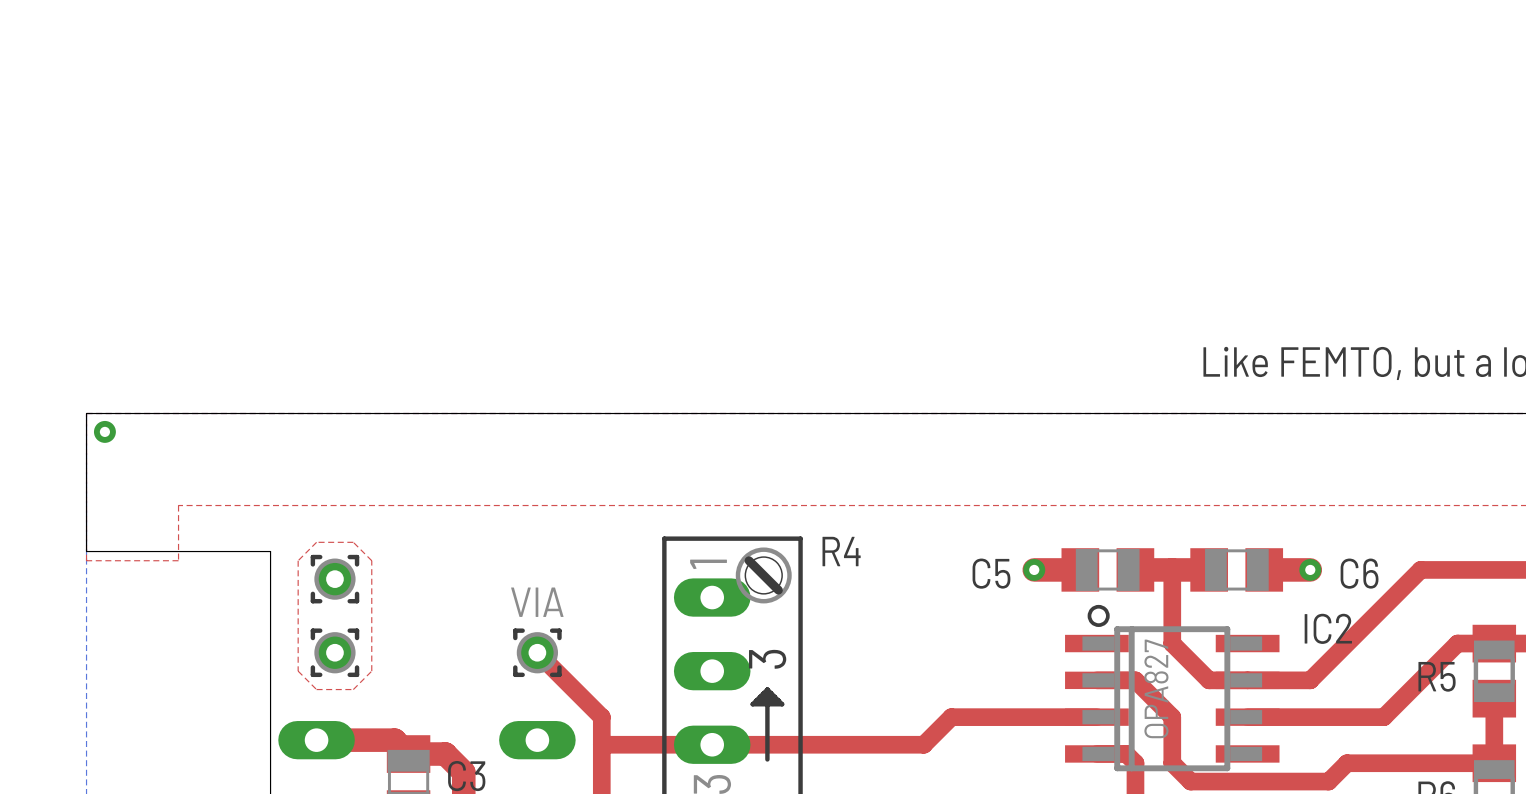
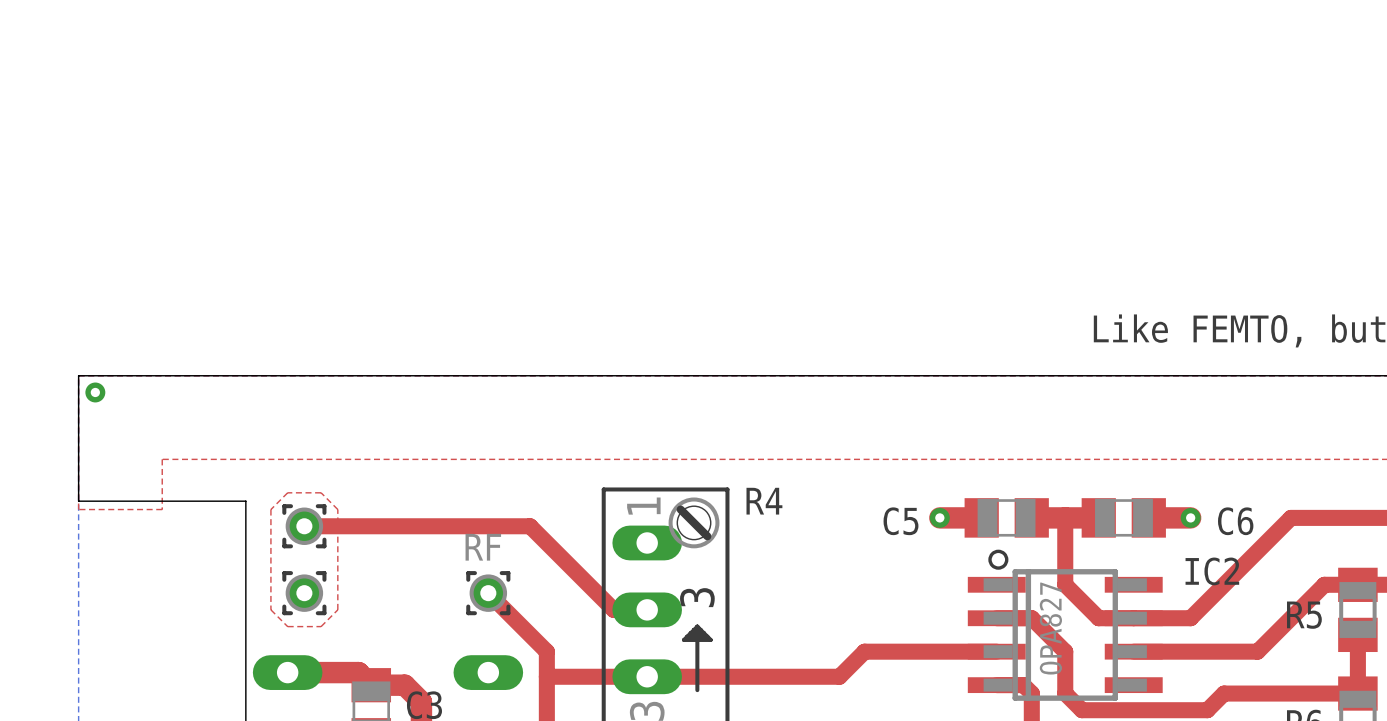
top track: none -> (304, 526) (530, 526) (613, 609) (647, 609)
part value: VIA (537, 602) -> RF (483, 547)

